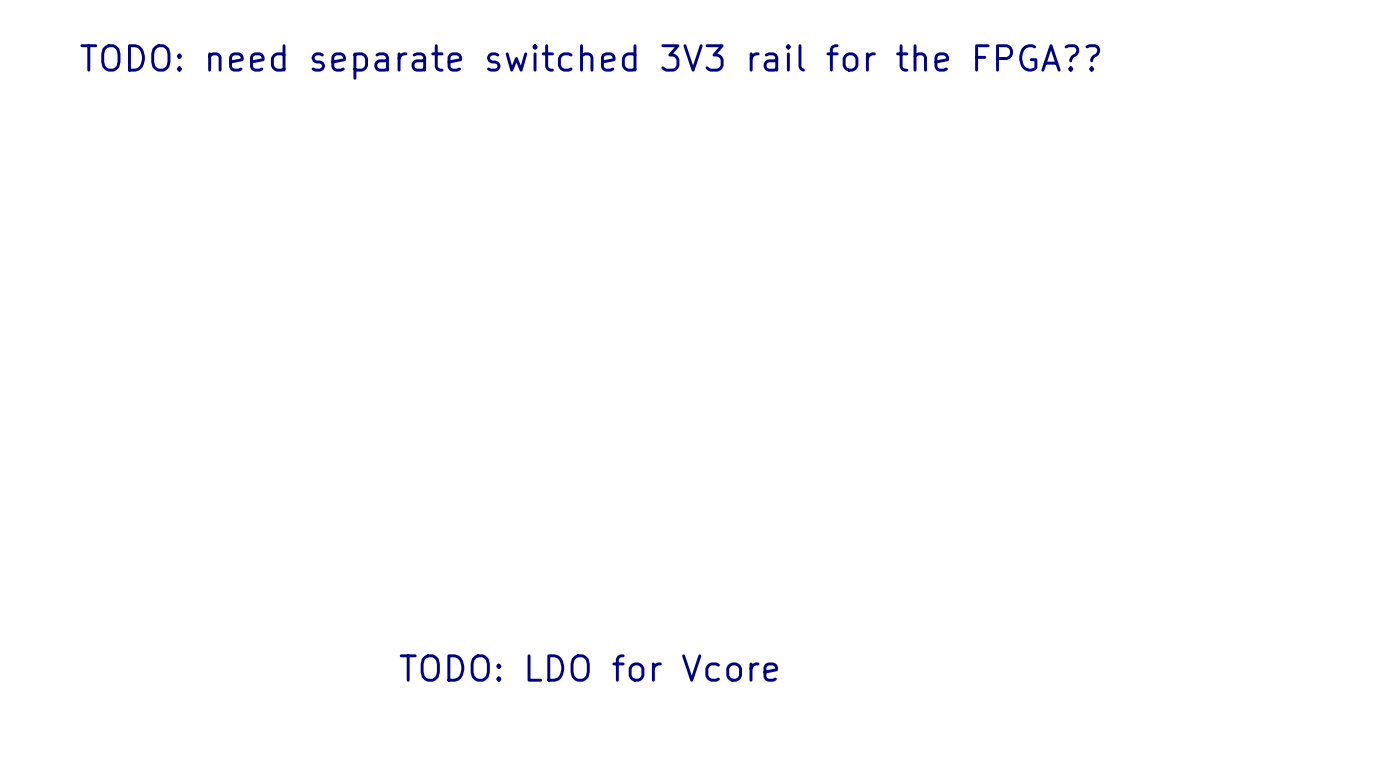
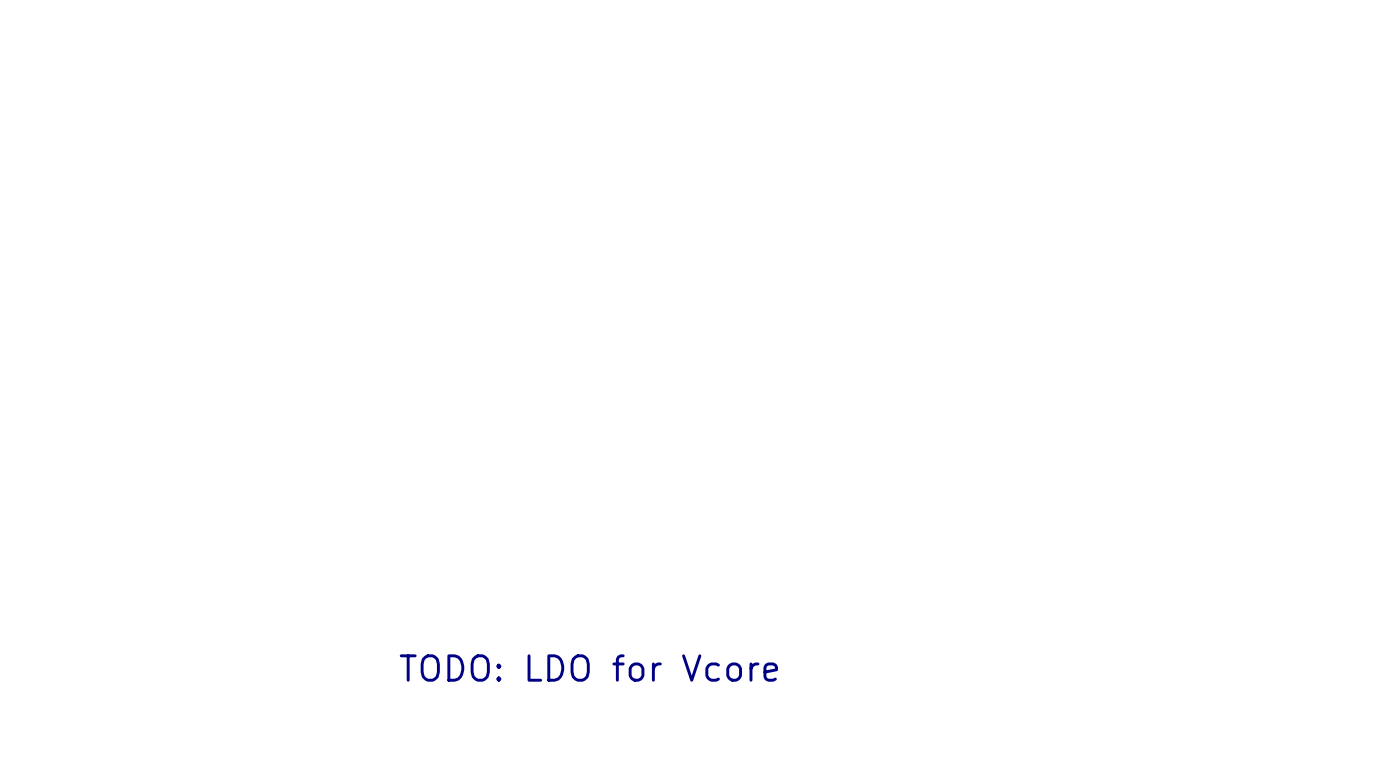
text: TODO: need separate switched 3V3 rail for the FPGA?? (590, 62) -> none

